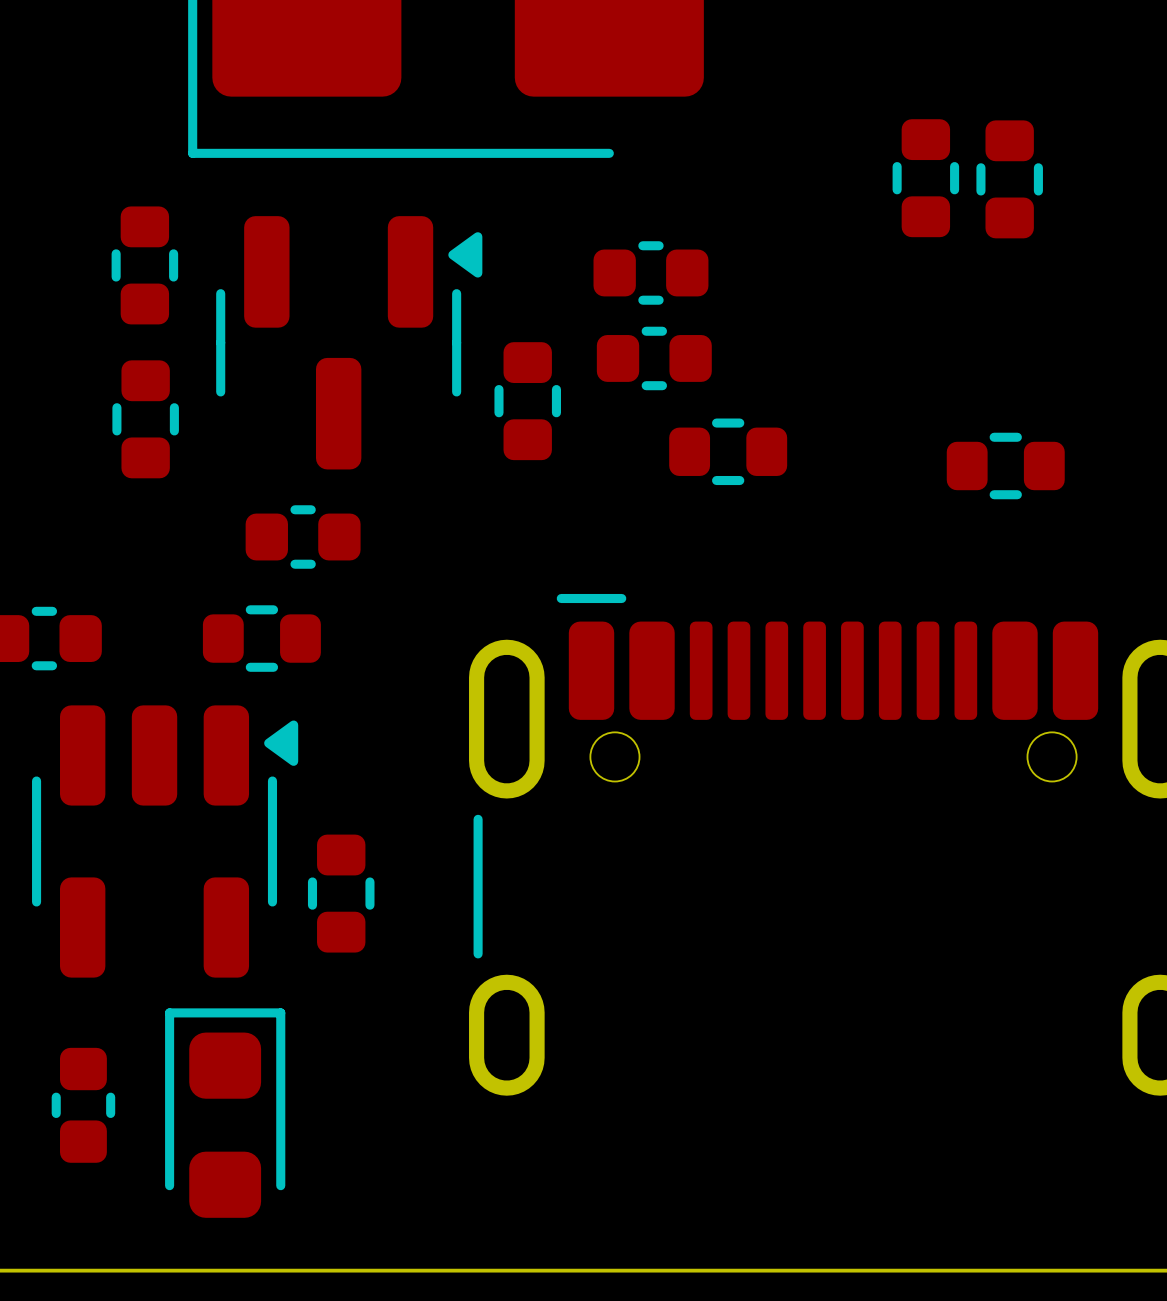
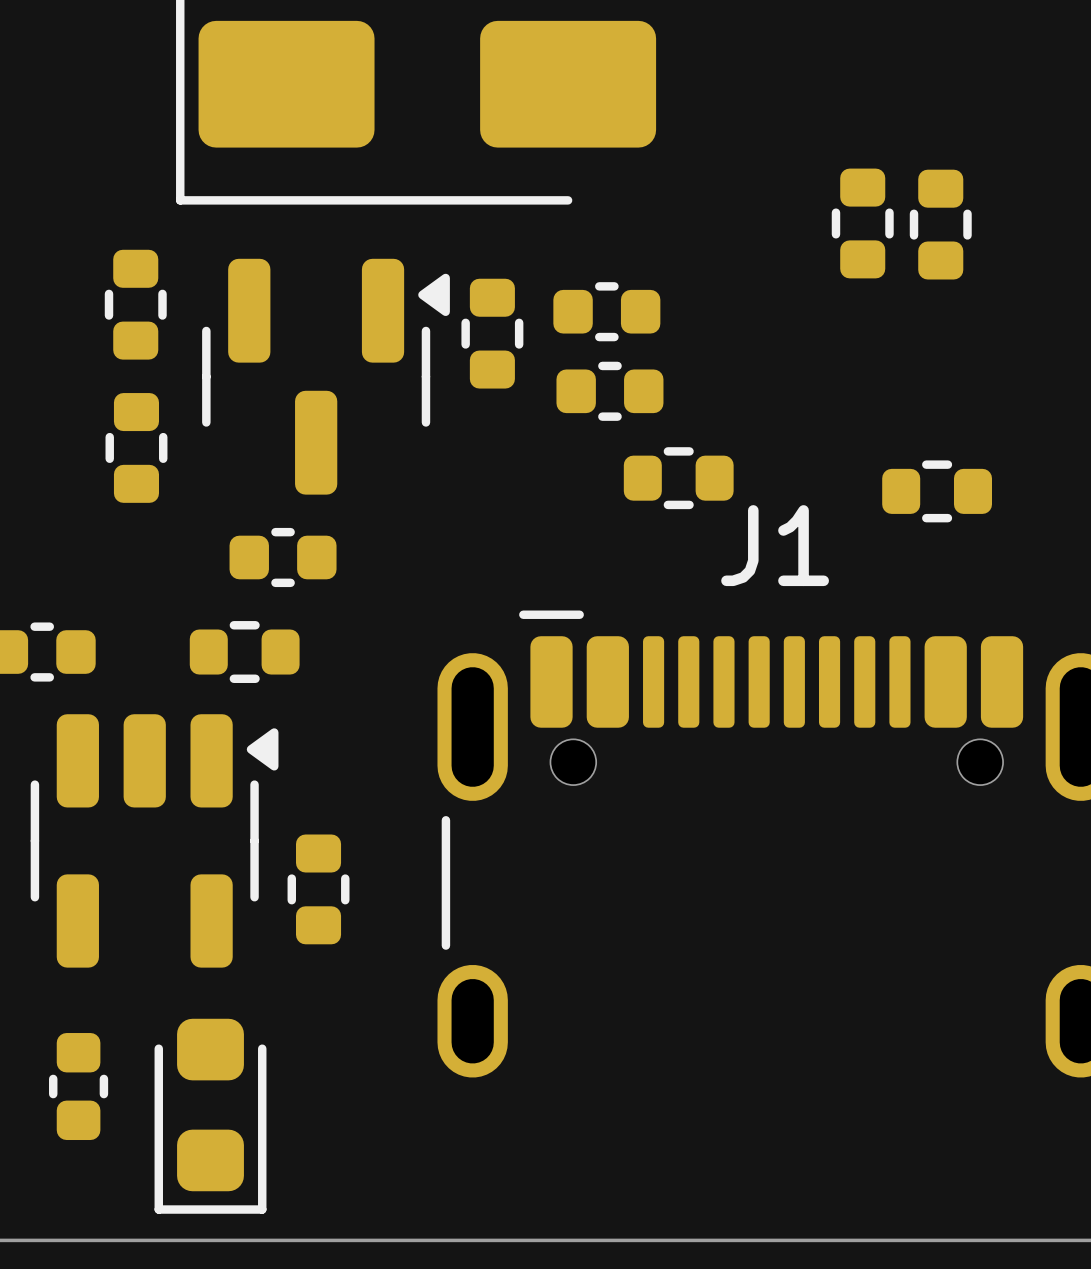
part position: (527, 401) -> (492, 333)
J1 name: none -> J1 (775, 545)
part rotation: 0° (225, 1113) -> 180° (210, 1116)

